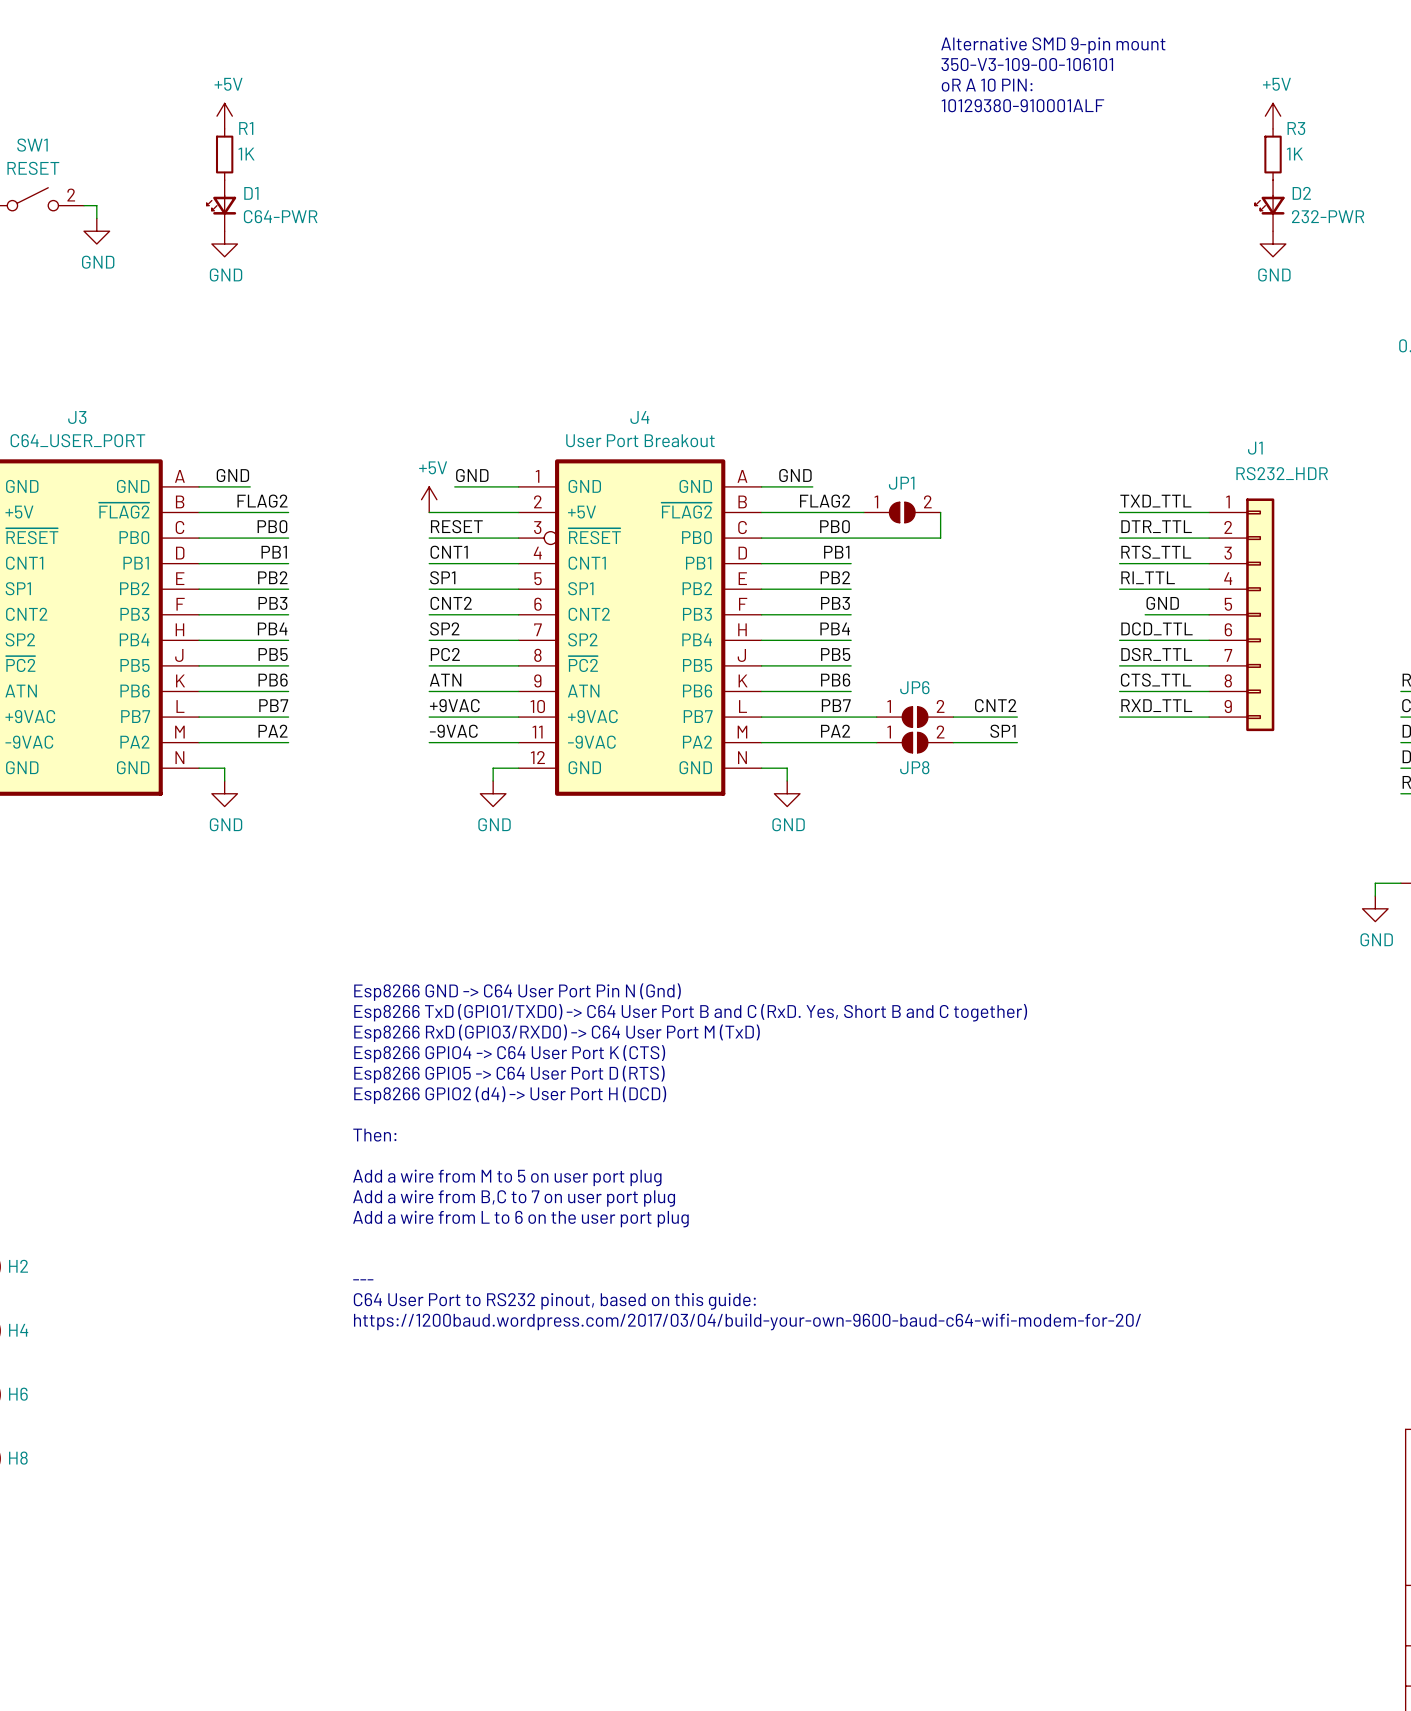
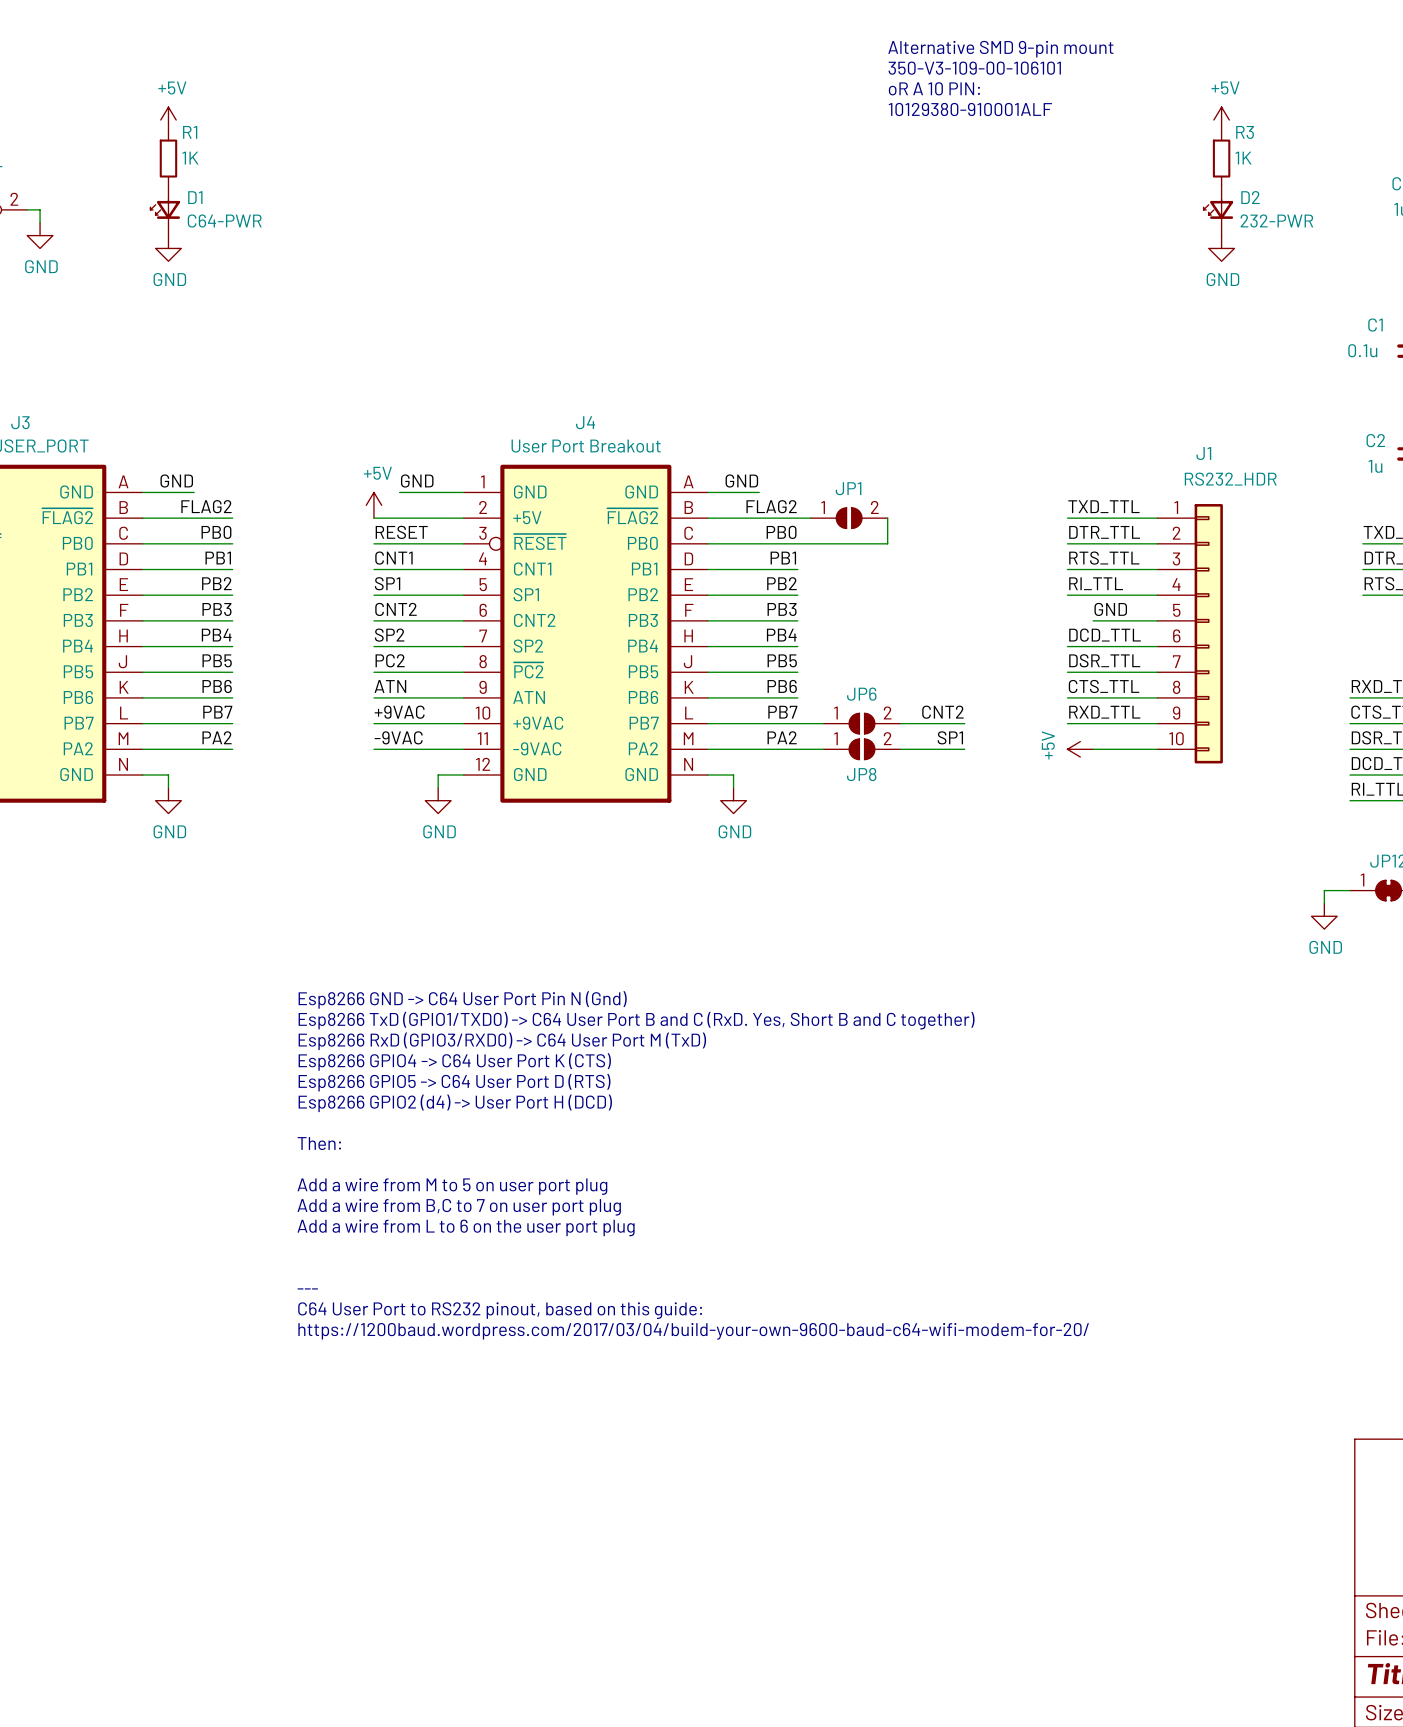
J1 symbol: [1209, 498, 1275, 732] -> [1157, 504, 1223, 764]
power symbol: none -> +5V (1080, 749)
wire: none -> (1093, 749) (1157, 749)

